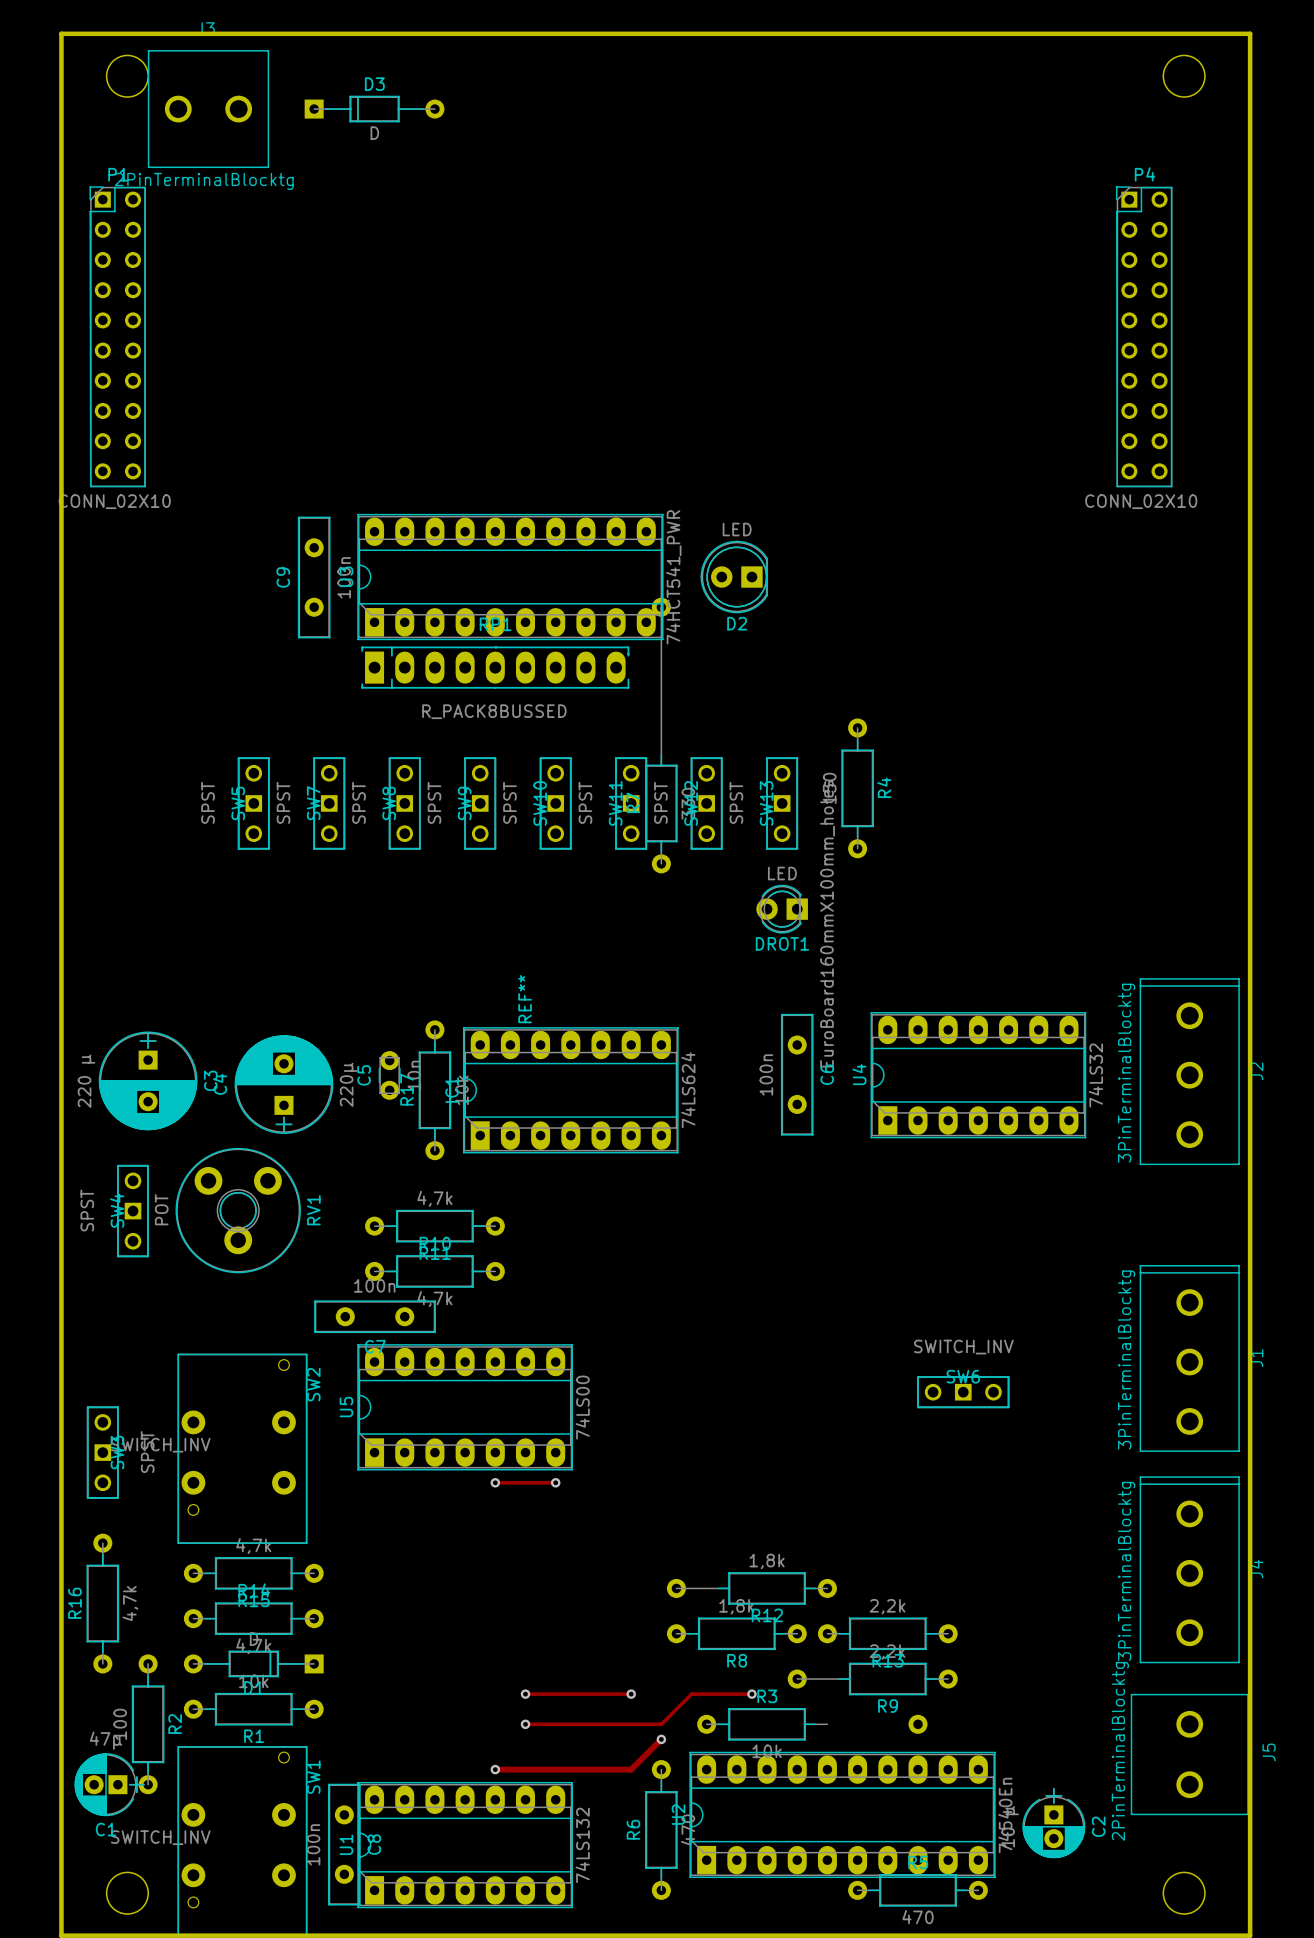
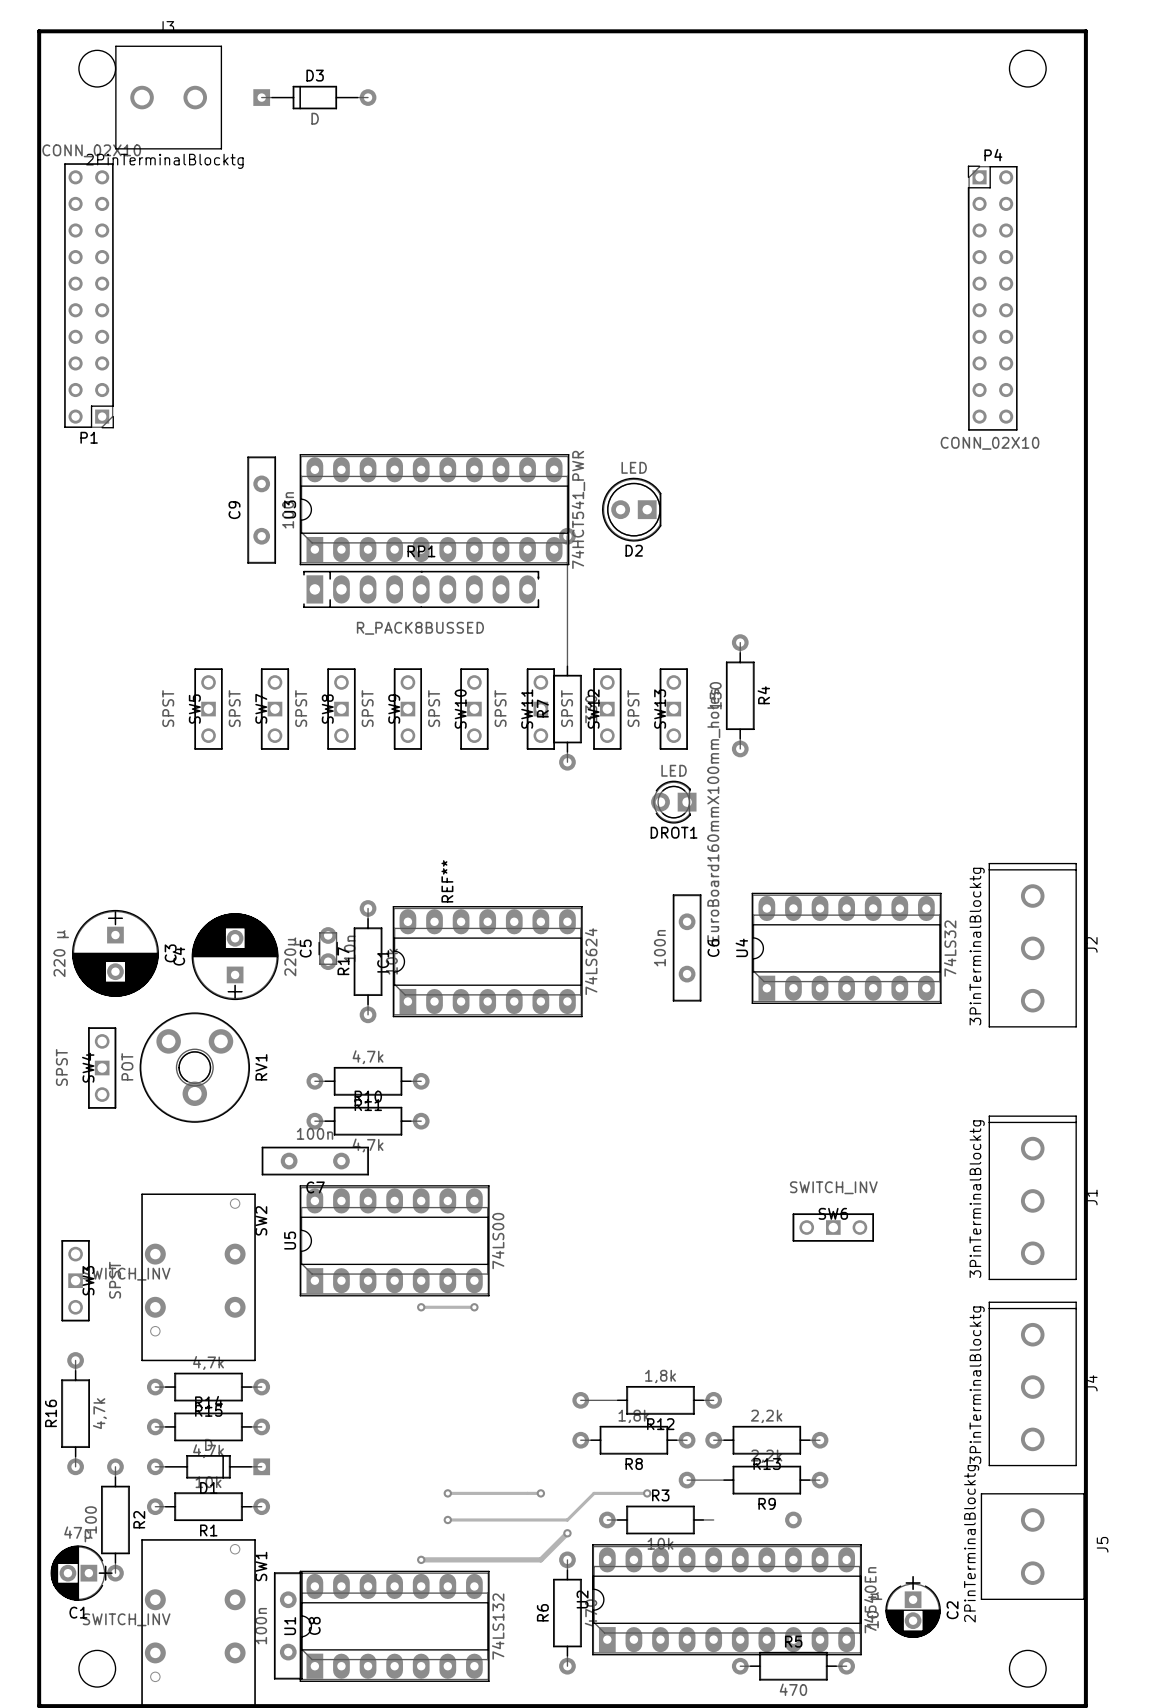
P1 rotation: 0° (117, 336) -> 180° (89, 295)

